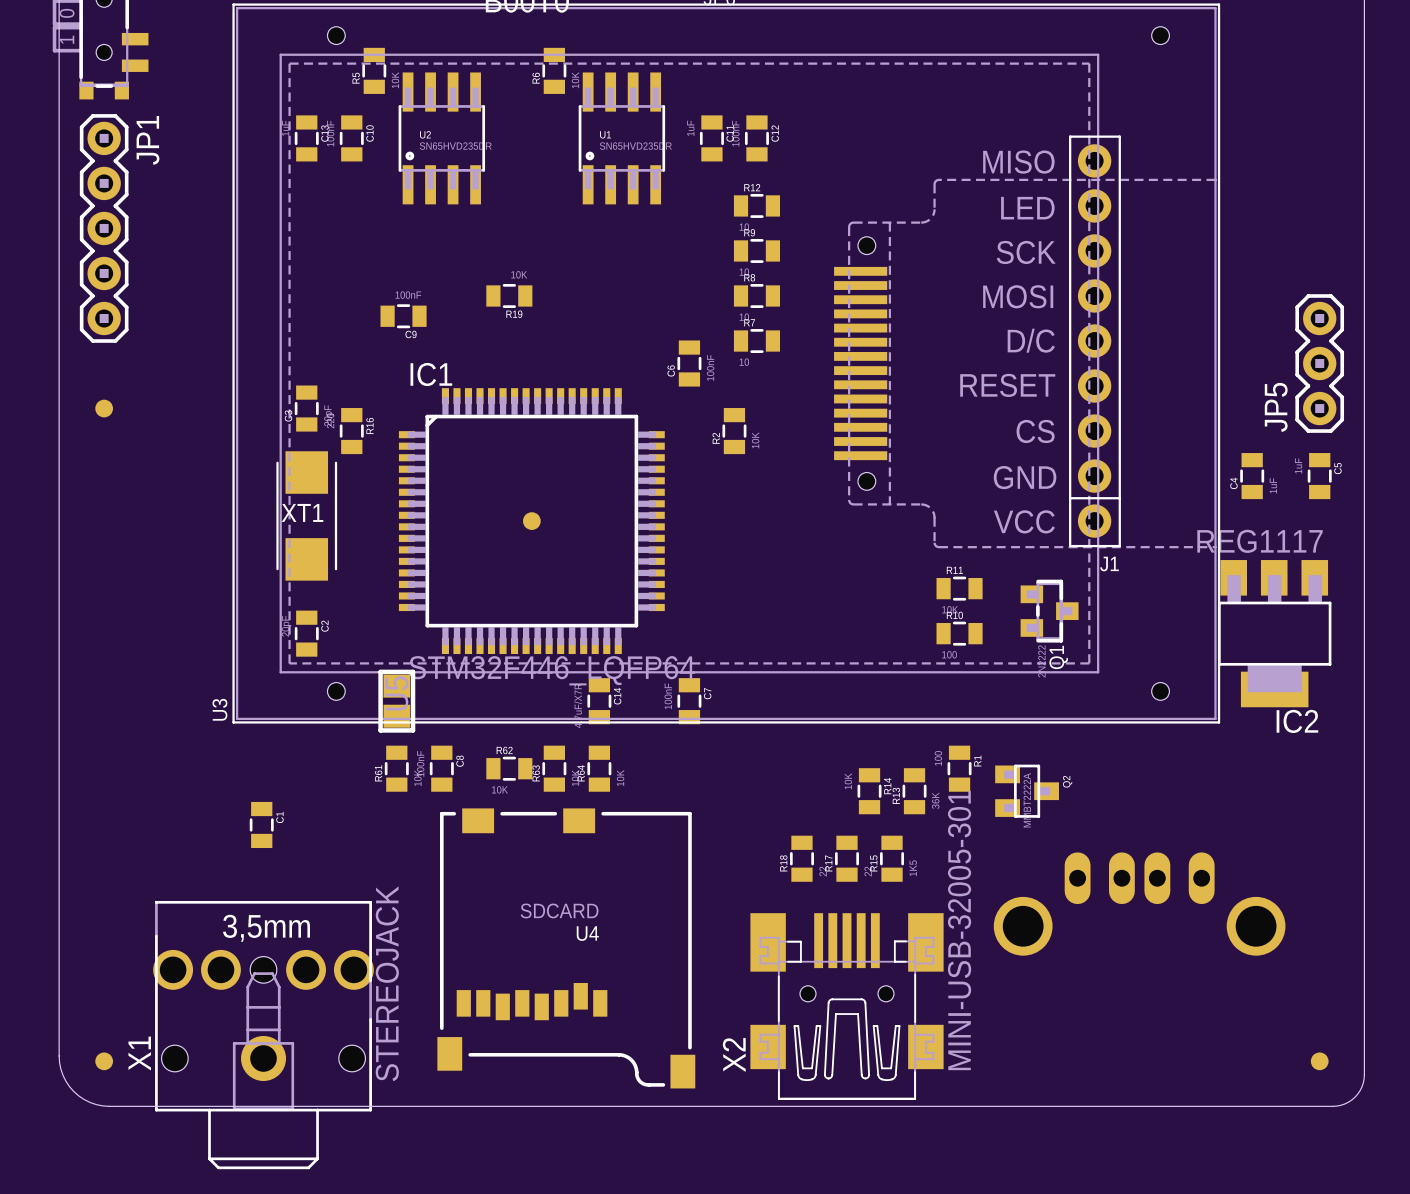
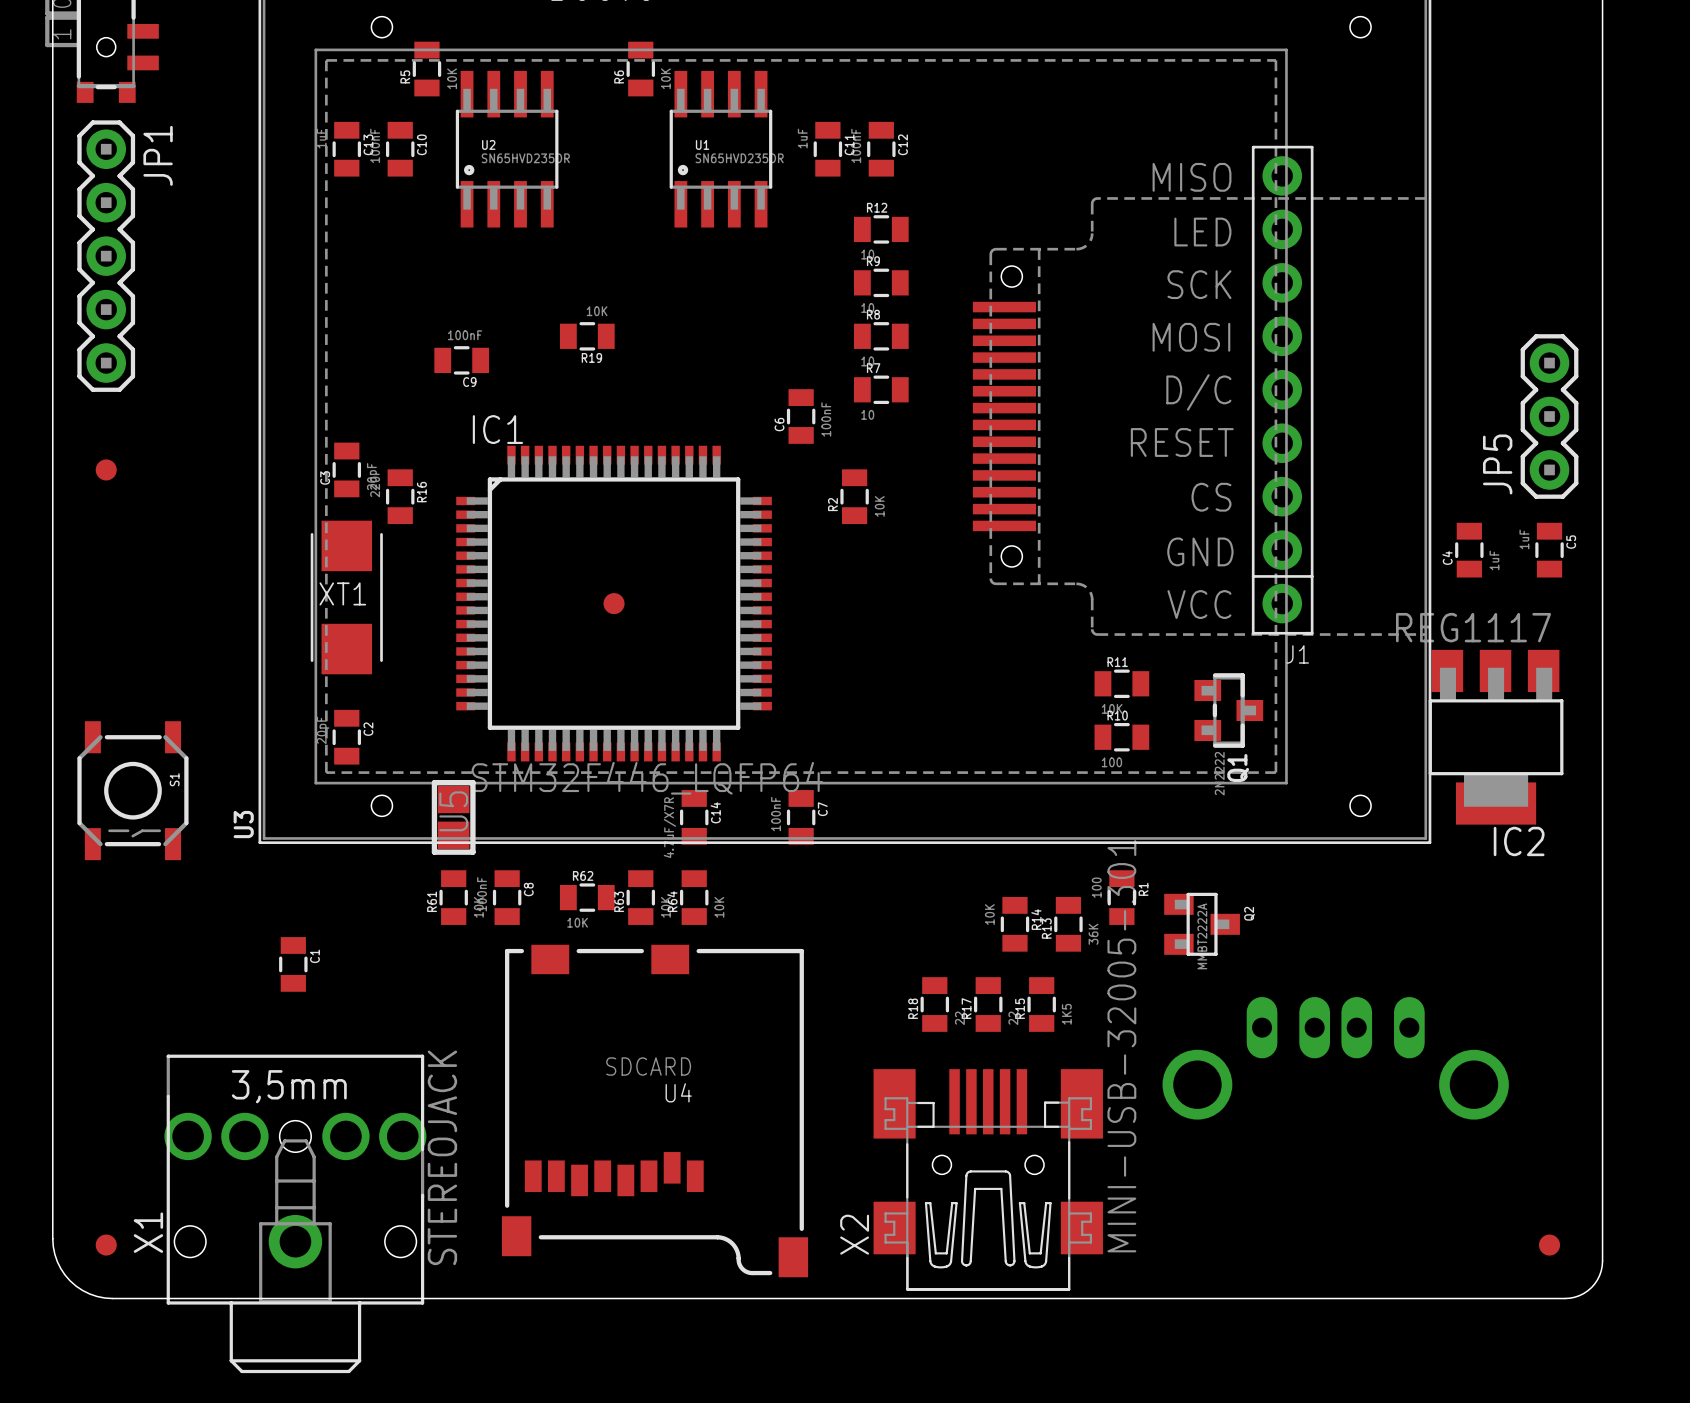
S1: none -> (132, 790)

